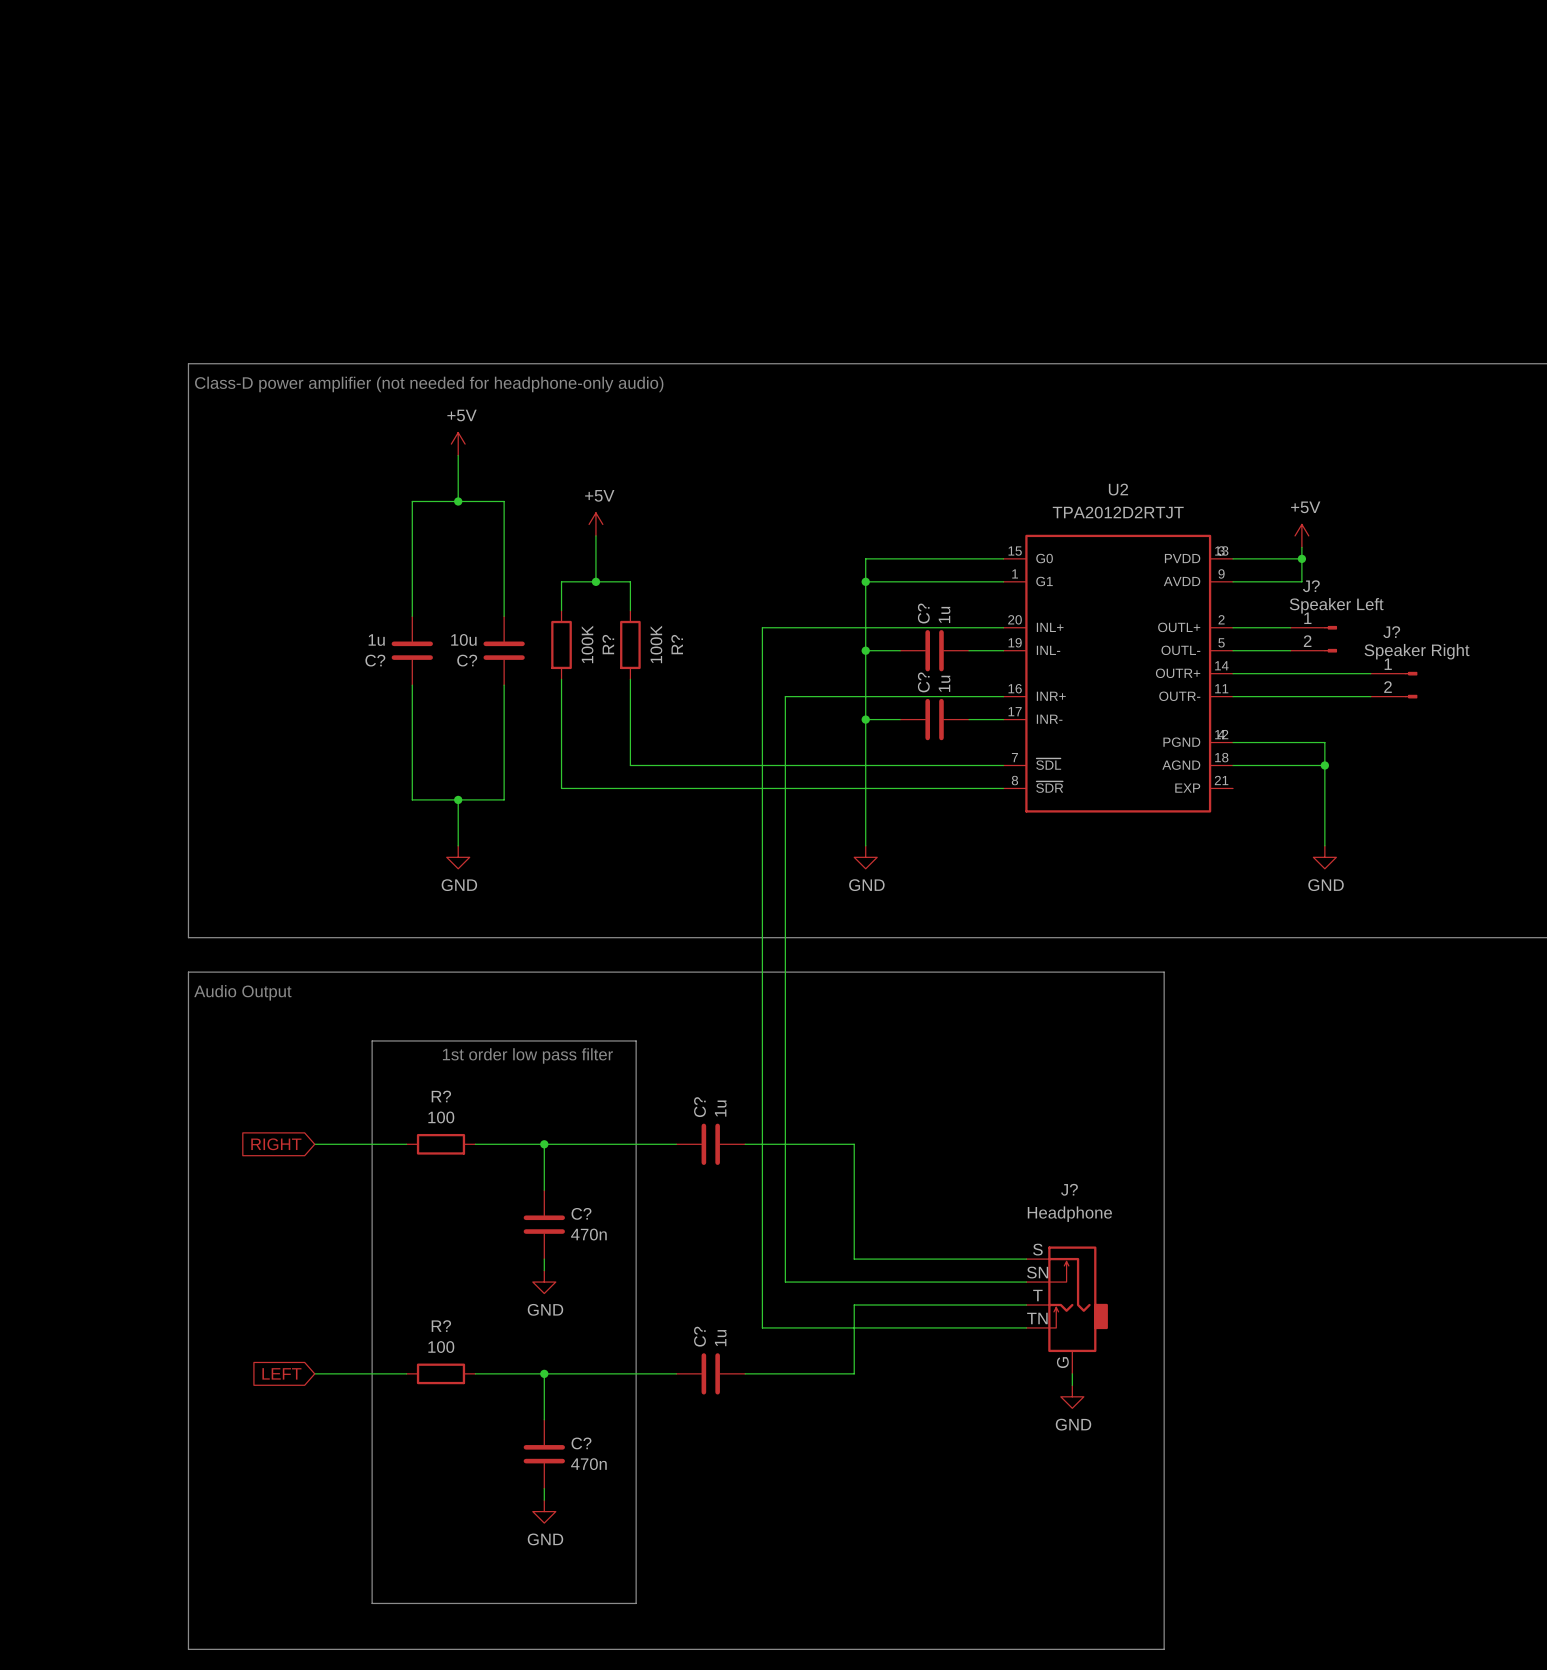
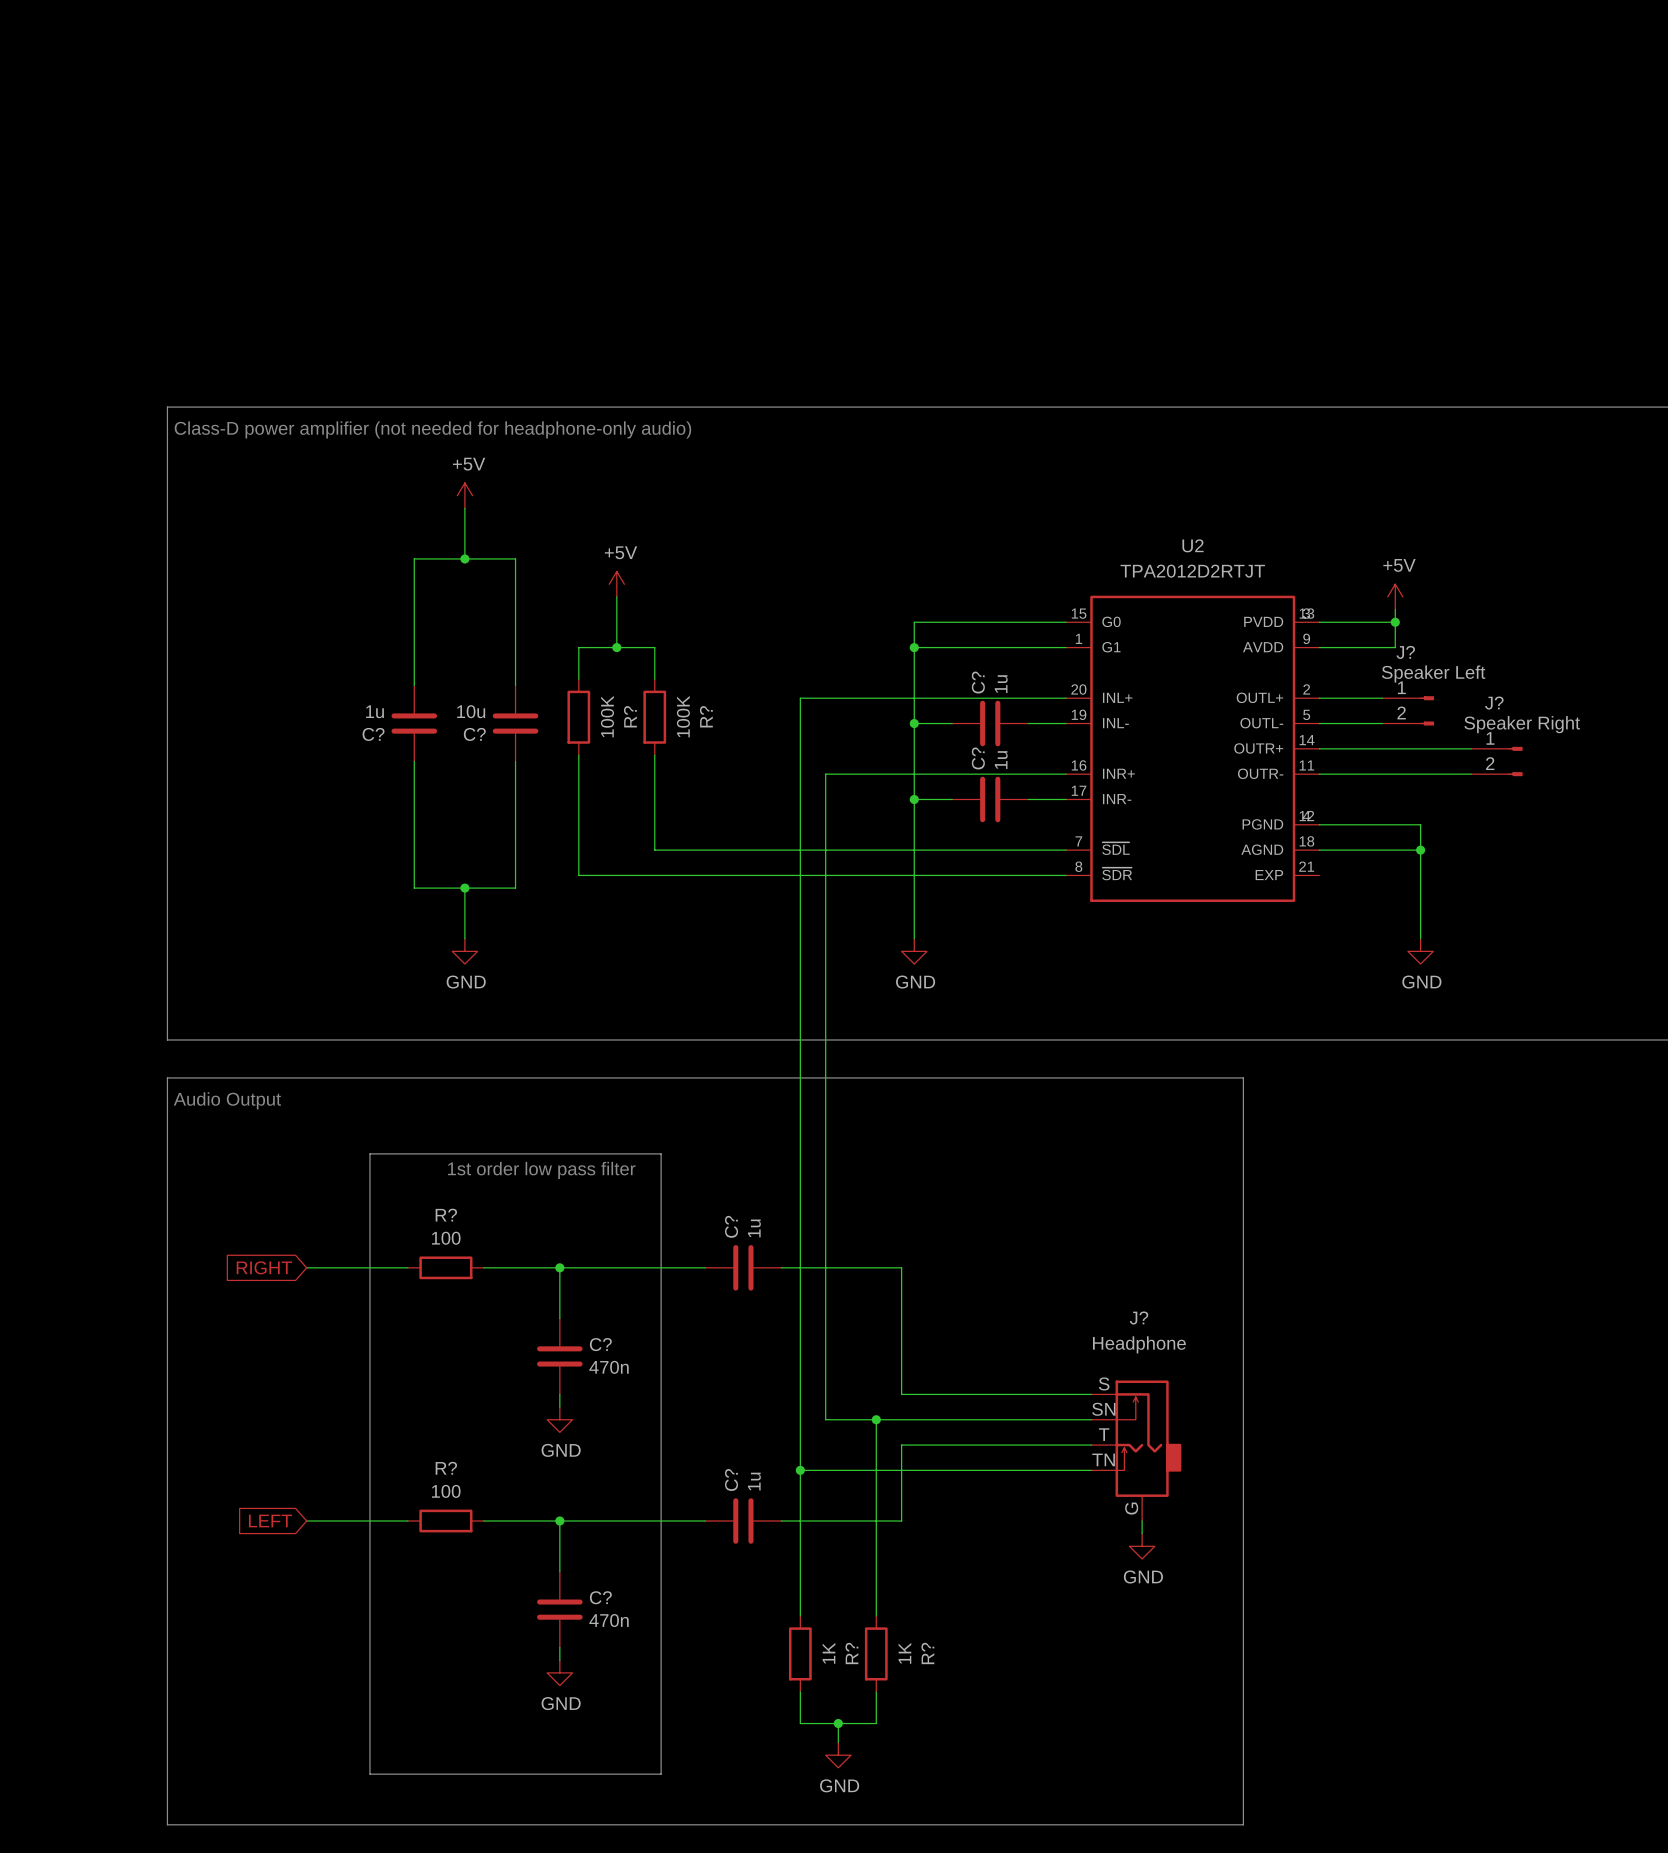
wire: none -> (876, 1419) (876, 1615)
junction: none -> (876, 1419)
wire: none -> (800, 1470) (800, 1615)
junction: none -> (800, 1470)
R?: none -> 1K (800, 1653)
R?: none -> 1K (876, 1653)
wire: none -> (800, 1691) (800, 1723) (876, 1723) (876, 1691)
wire: none -> (838, 1723) (838, 1742)
junction: none -> (838, 1723)
power symbol: none -> GND (838, 1755)

